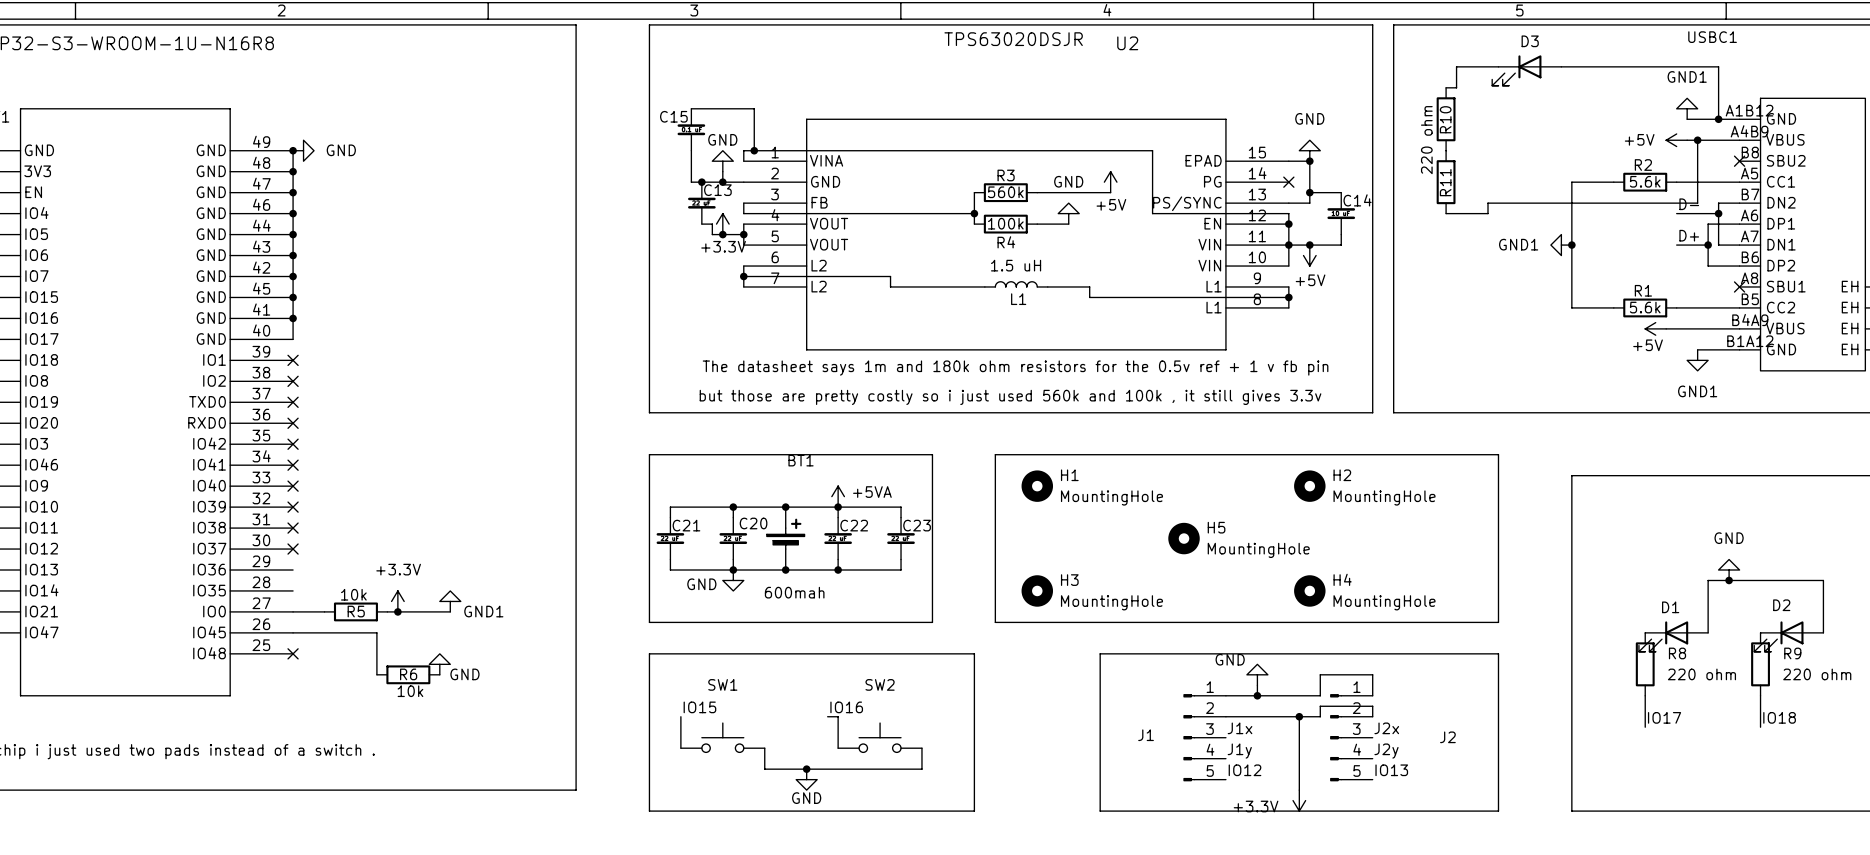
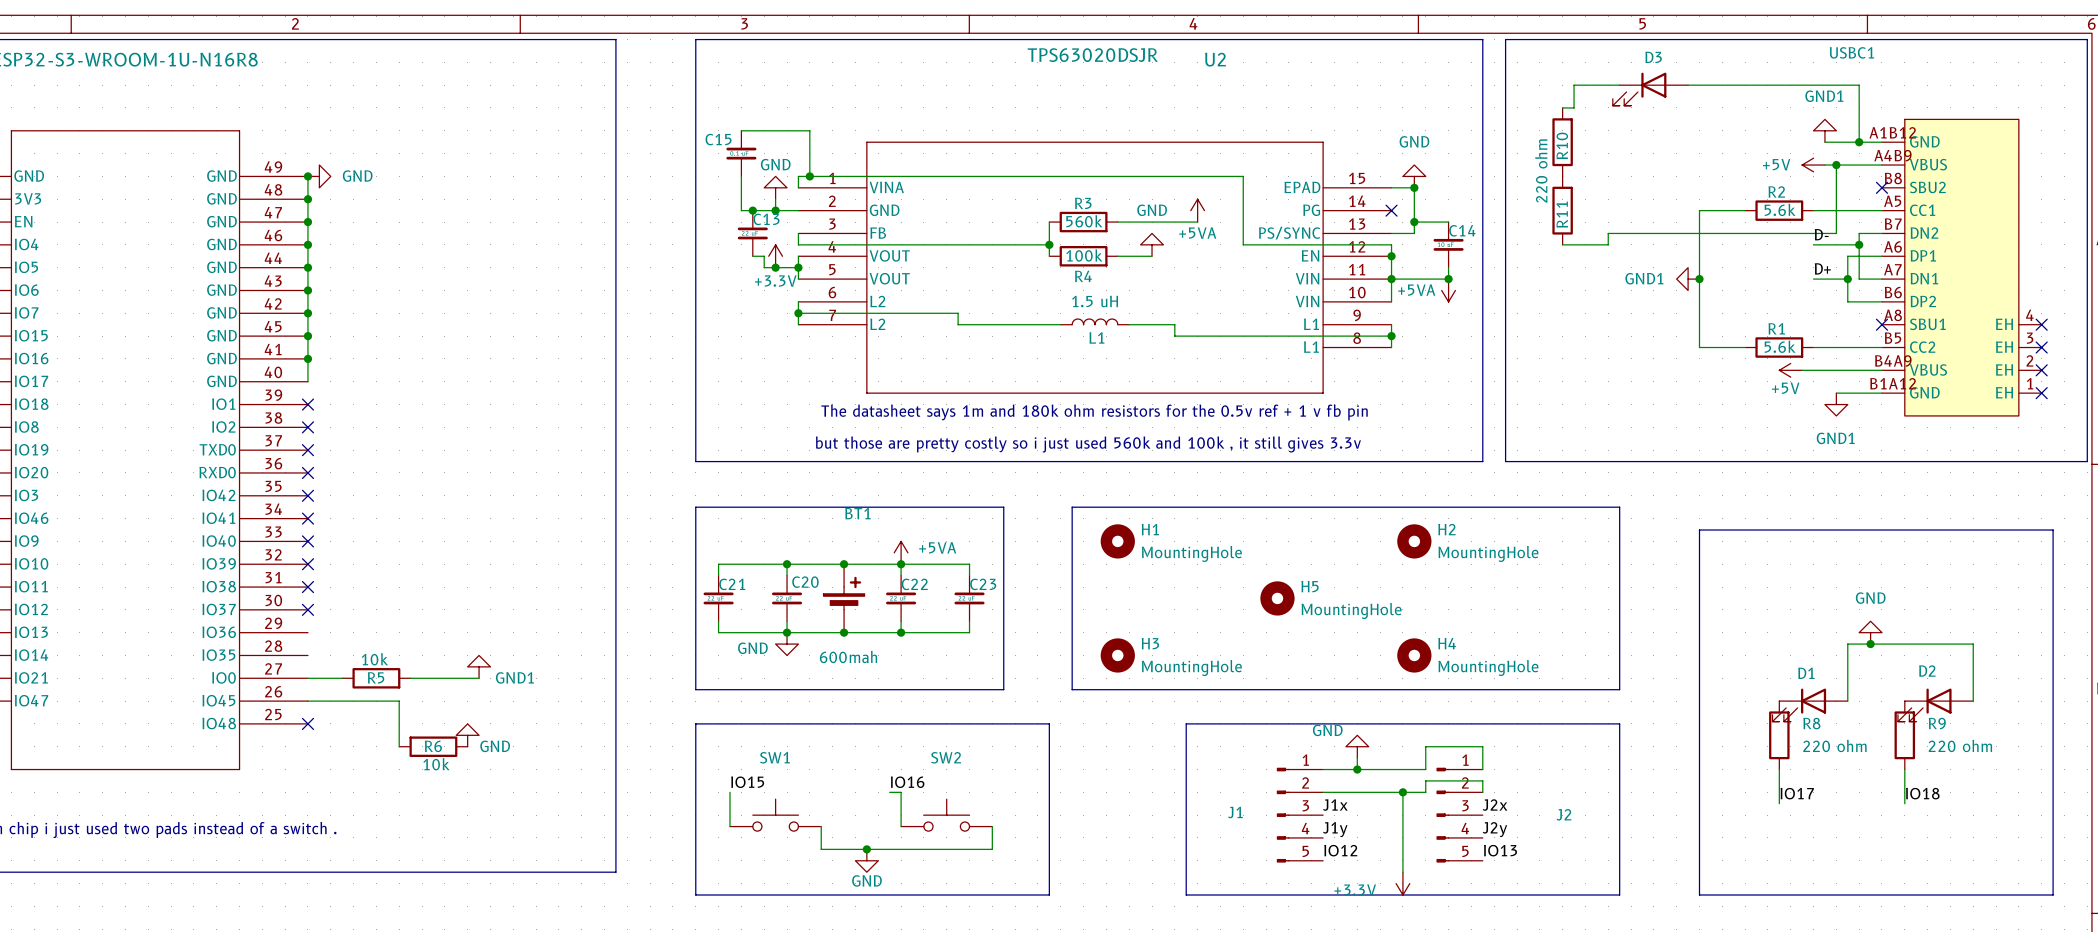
power symbol: +5V (1110, 182) -> +5VA (1197, 210)
junction position: (1309, 245) -> (1448, 279)
power symbol: +5V (1309, 255) -> none
power symbol: none -> +5VA (1448, 290)
power symbol: +3.3V (397, 601) -> none
junction: (397, 611) -> none

